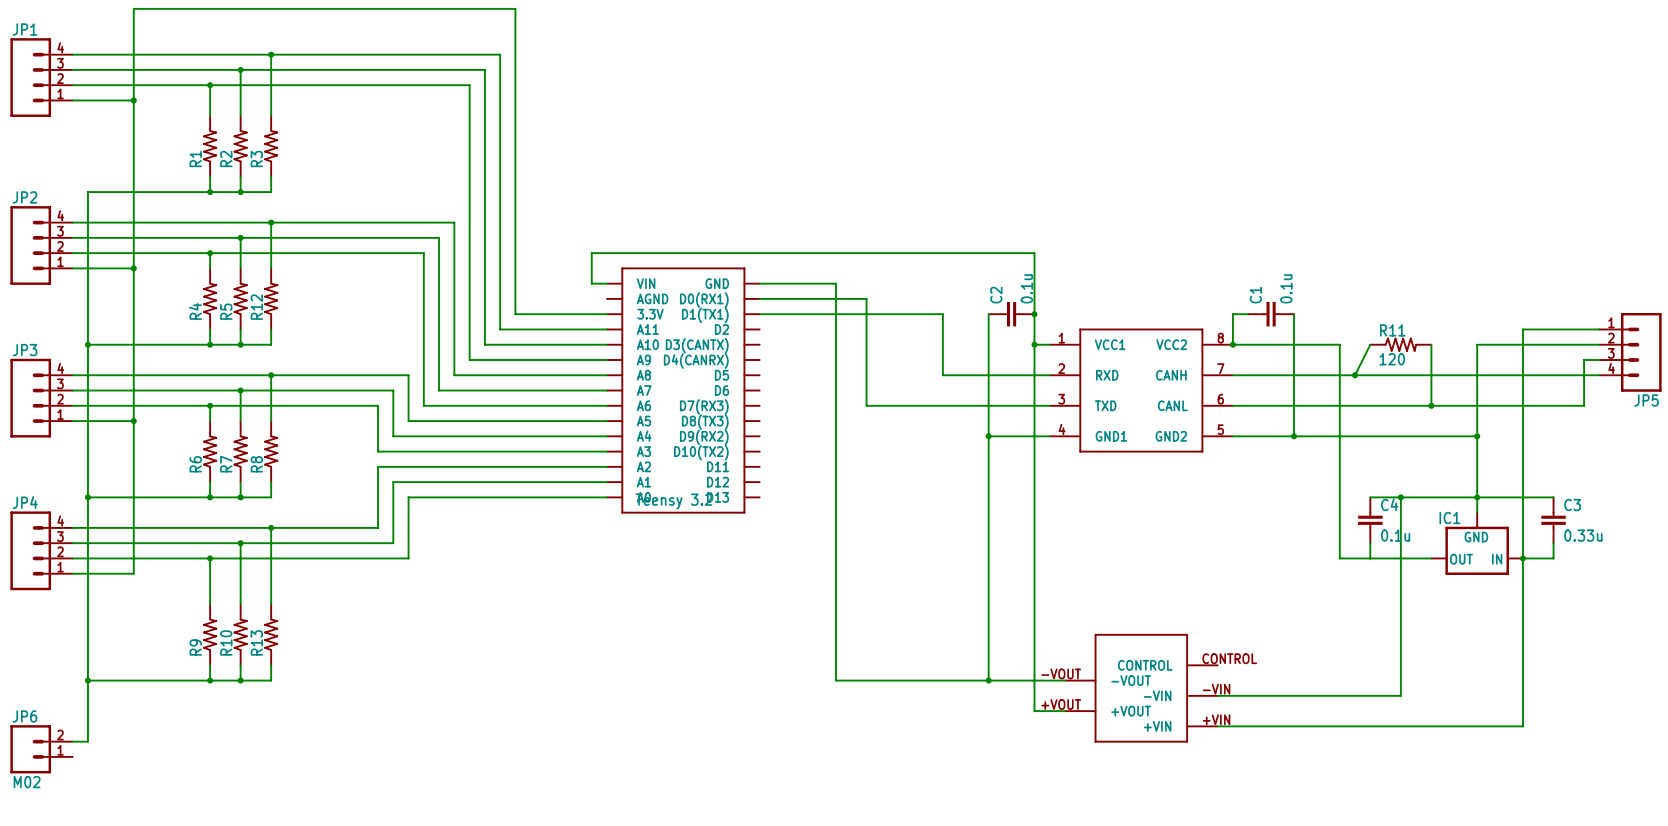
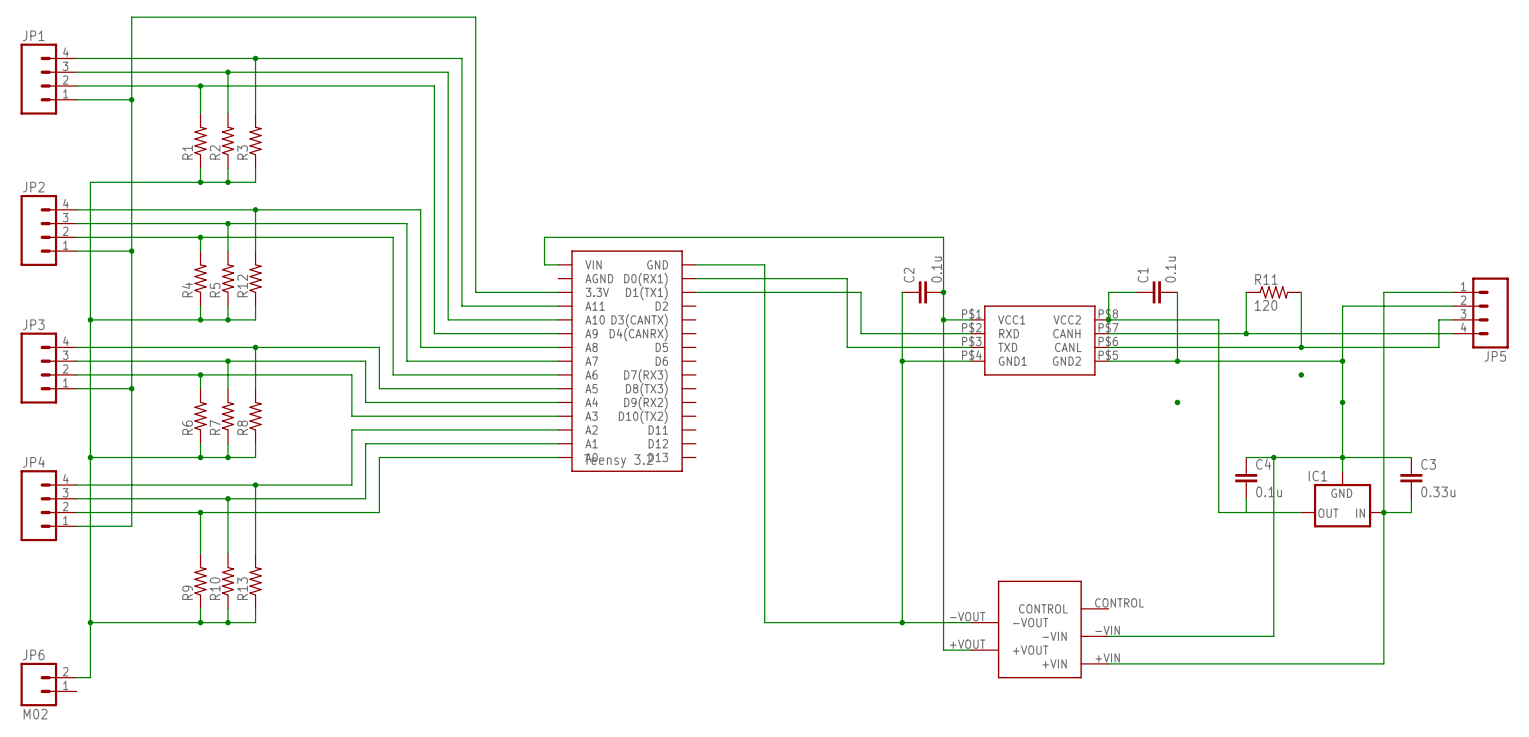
wire: (866, 298) (866, 405) (1049, 405) -> none
wire: (1232, 314) (1232, 344) -> (1122, 292) (1108, 292) (1108, 319) (1122, 319)
junction position: (1232, 344) -> (1108, 319)
wire: (1370, 344) (1355, 375) -> none
R11 position: (1400, 344) -> (1273, 292)
wire: (1477, 344) (1584, 344) -> (1342, 319) (1342, 306) (1383, 306) (1383, 292) (1452, 292)
wire: none -> (1438, 319) (1438, 333) (1108, 333)
JP5 position: (1630, 352) -> (1480, 313)
wire: (942, 360) (942, 375) -> (792, 278) (847, 278) (847, 347) (860, 347)
wire: none -> (860, 333) (971, 333)
part: none -> (1039, 340)
junction position: (1355, 375) -> (1246, 333)
wire: (1431, 375) (1431, 405) -> (1301, 292) (1301, 319)
junction: none -> (1301, 347)
wire: (1599, 375) (1584, 375) (1584, 405) (1232, 405) -> none
wire: none -> (902, 361) (971, 361)
junction: none -> (902, 361)
part: (1141, 390) -> none
wire: none -> (1108, 361) (1342, 361)
wire: (1294, 390) (1294, 436) -> (1246, 292) (1246, 333)
junction: none -> (1177, 361)
junction: none -> (1342, 361)
wire: (988, 436) (1049, 436) -> none
junction: (988, 436) -> none
wire: (1232, 436) (1477, 436) -> none

